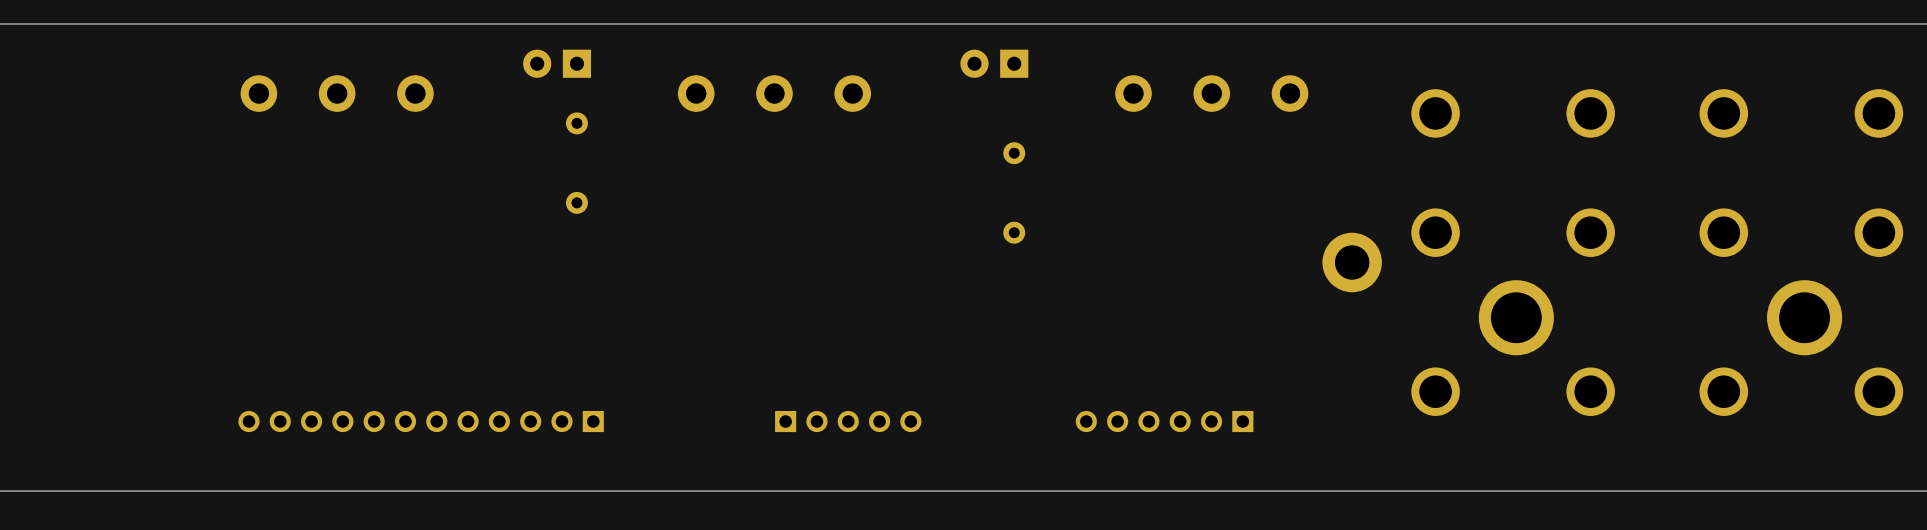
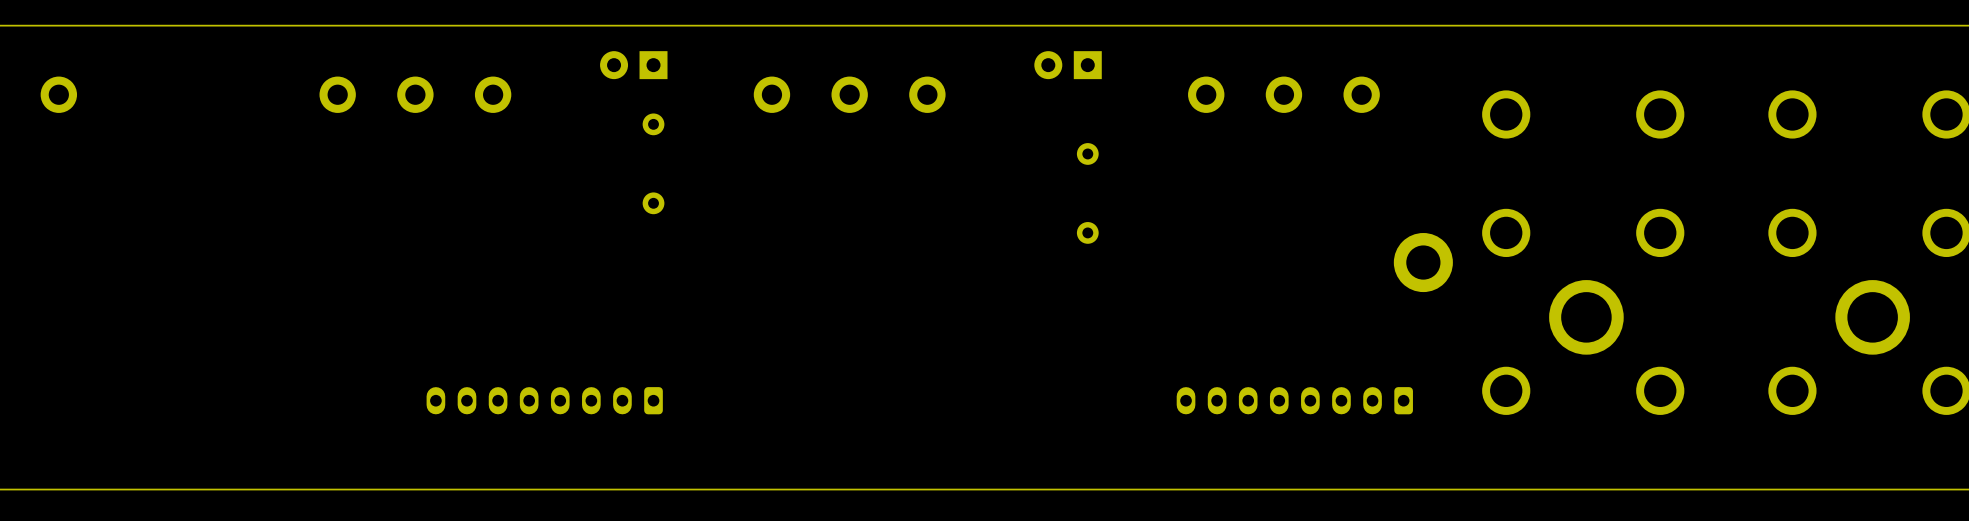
part: none -> (544, 400)
part: none -> (1294, 400)
part: (421, 421) -> none
part: (848, 421) -> none
part: (1164, 421) -> none

